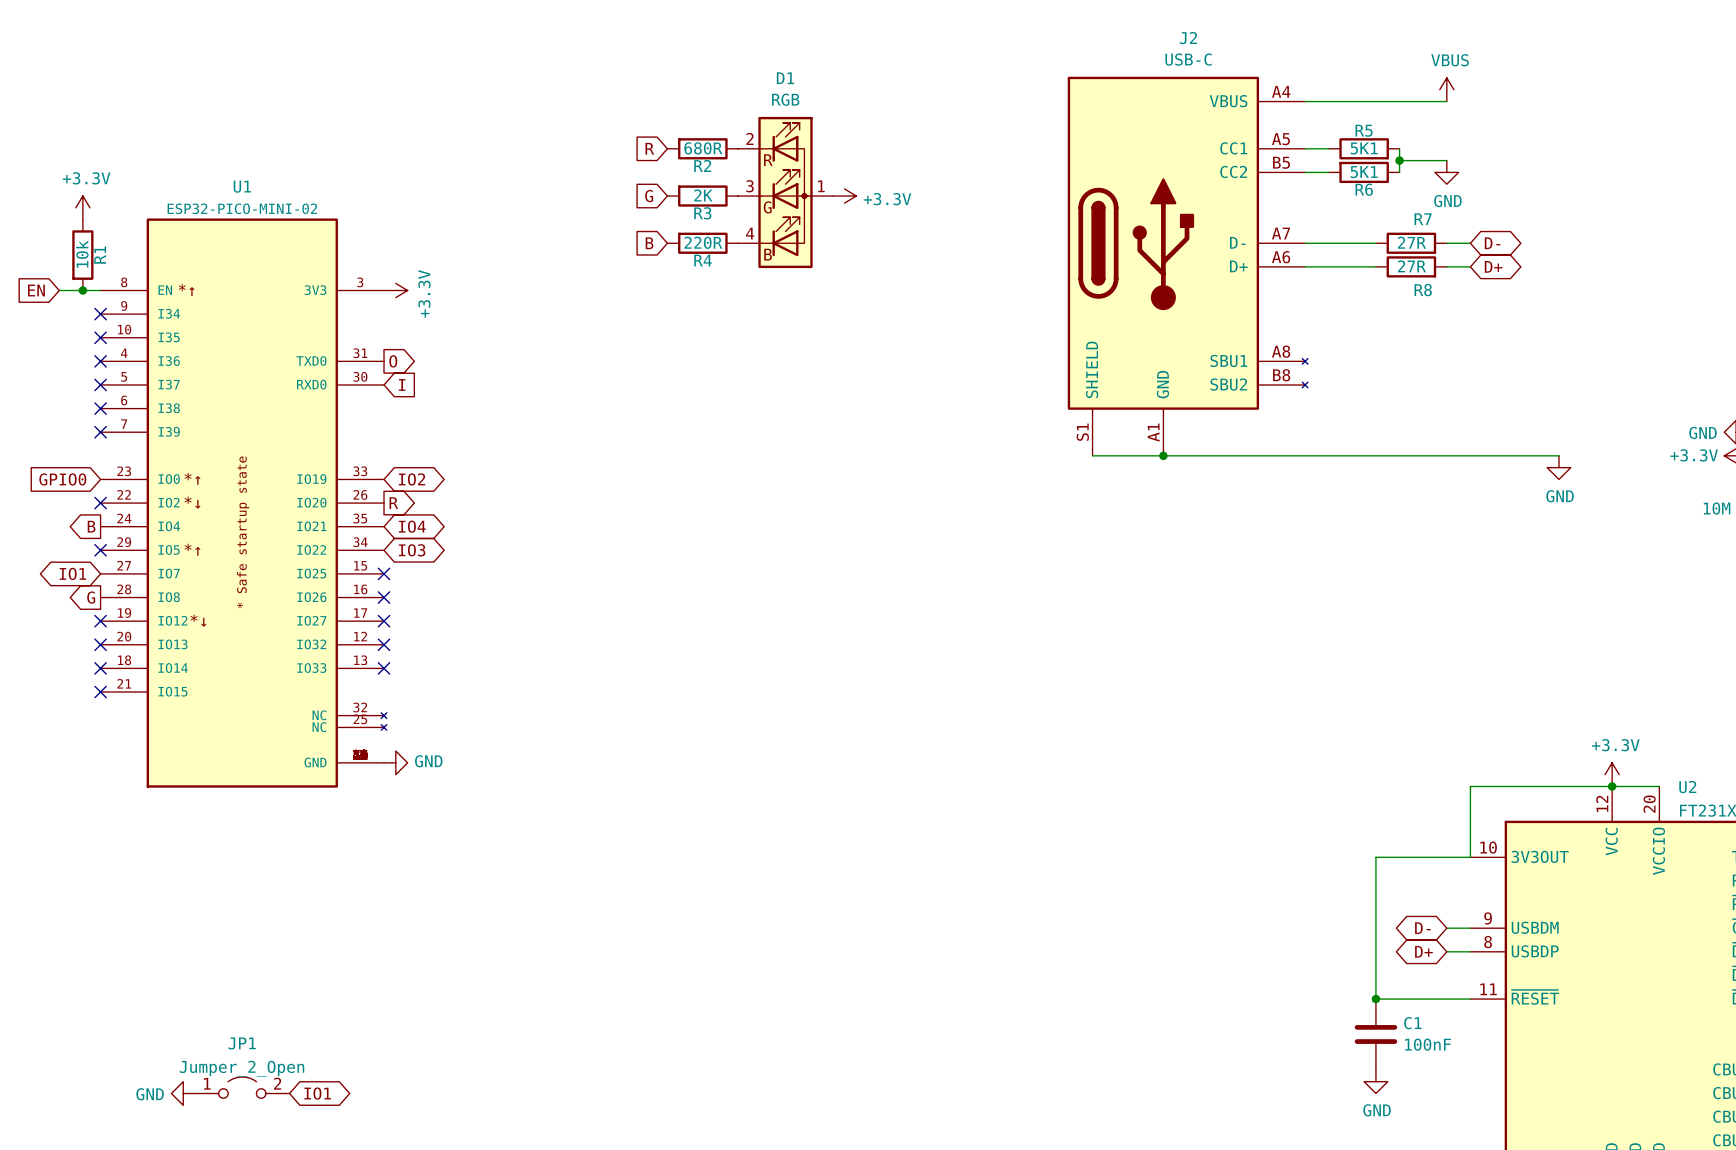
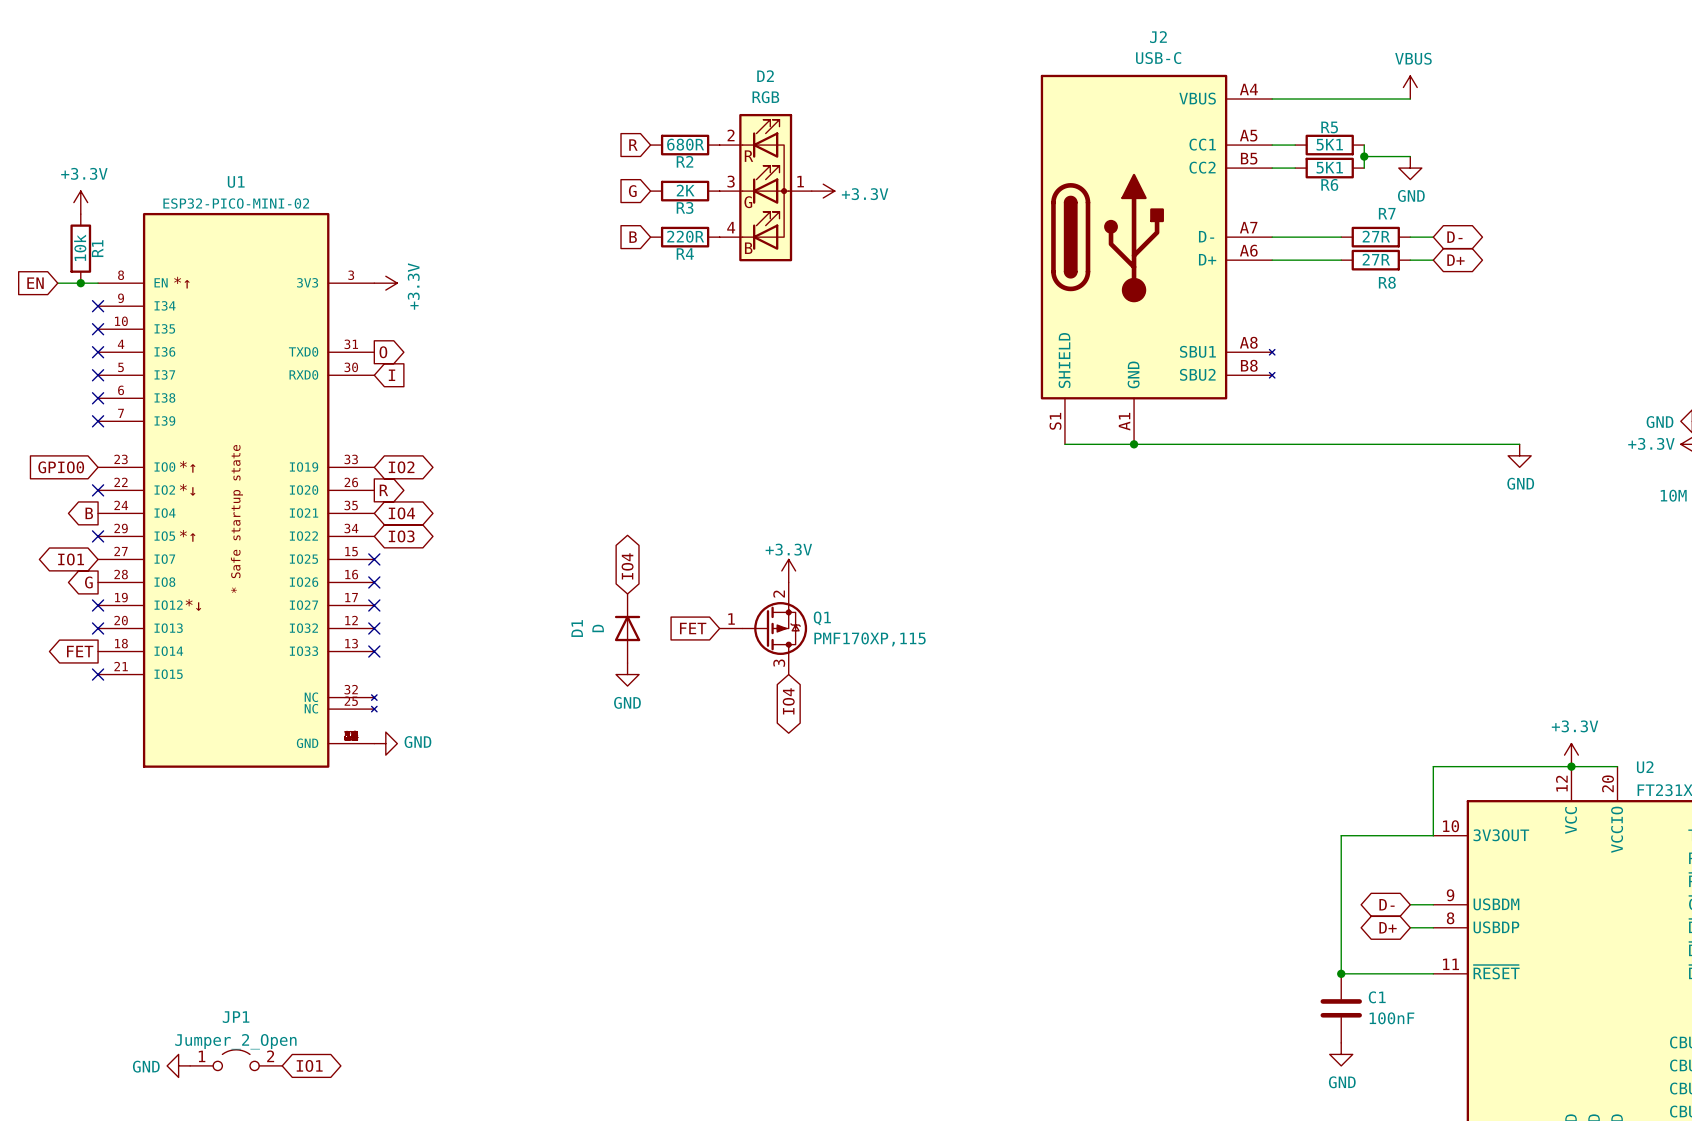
D1 name: D1 (785, 78) -> D2 (765, 76)
global label: none -> IO4 (627, 566)
power symbol: none -> +3.3V (788, 570)
D1: none -> D (627, 628)
global label: none -> FET (693, 628)
Q1: none -> PMF170XP,115 (763, 628)
global label: none -> FET (80, 651)
no-connect mark: (100, 668) -> none
power symbol: none -> GND (627, 674)
global label: none -> IO4 (788, 701)

